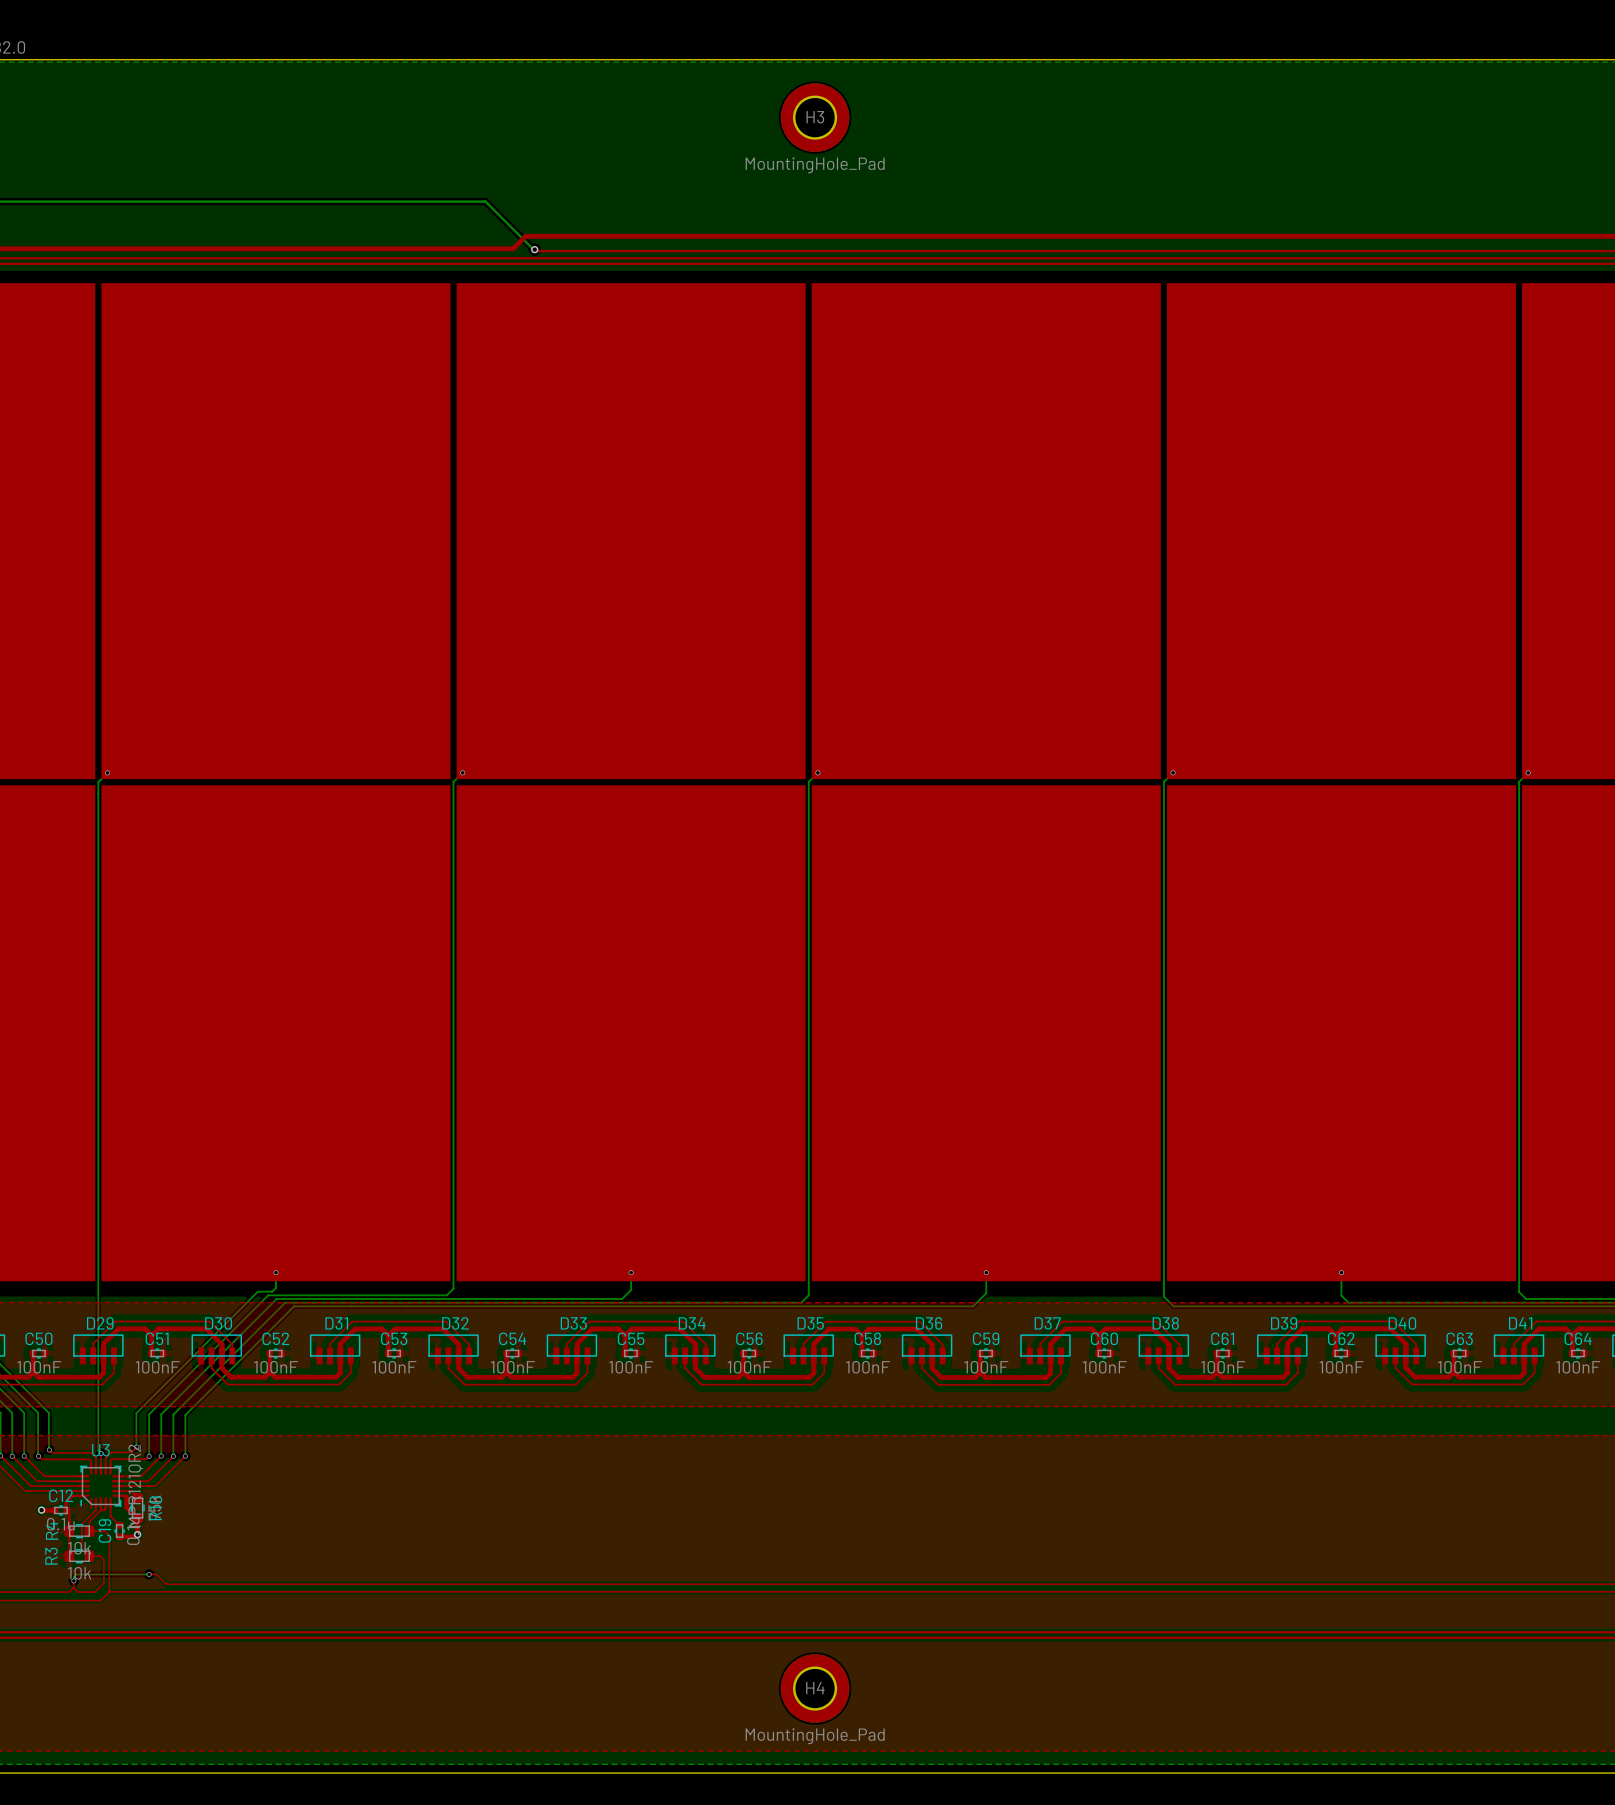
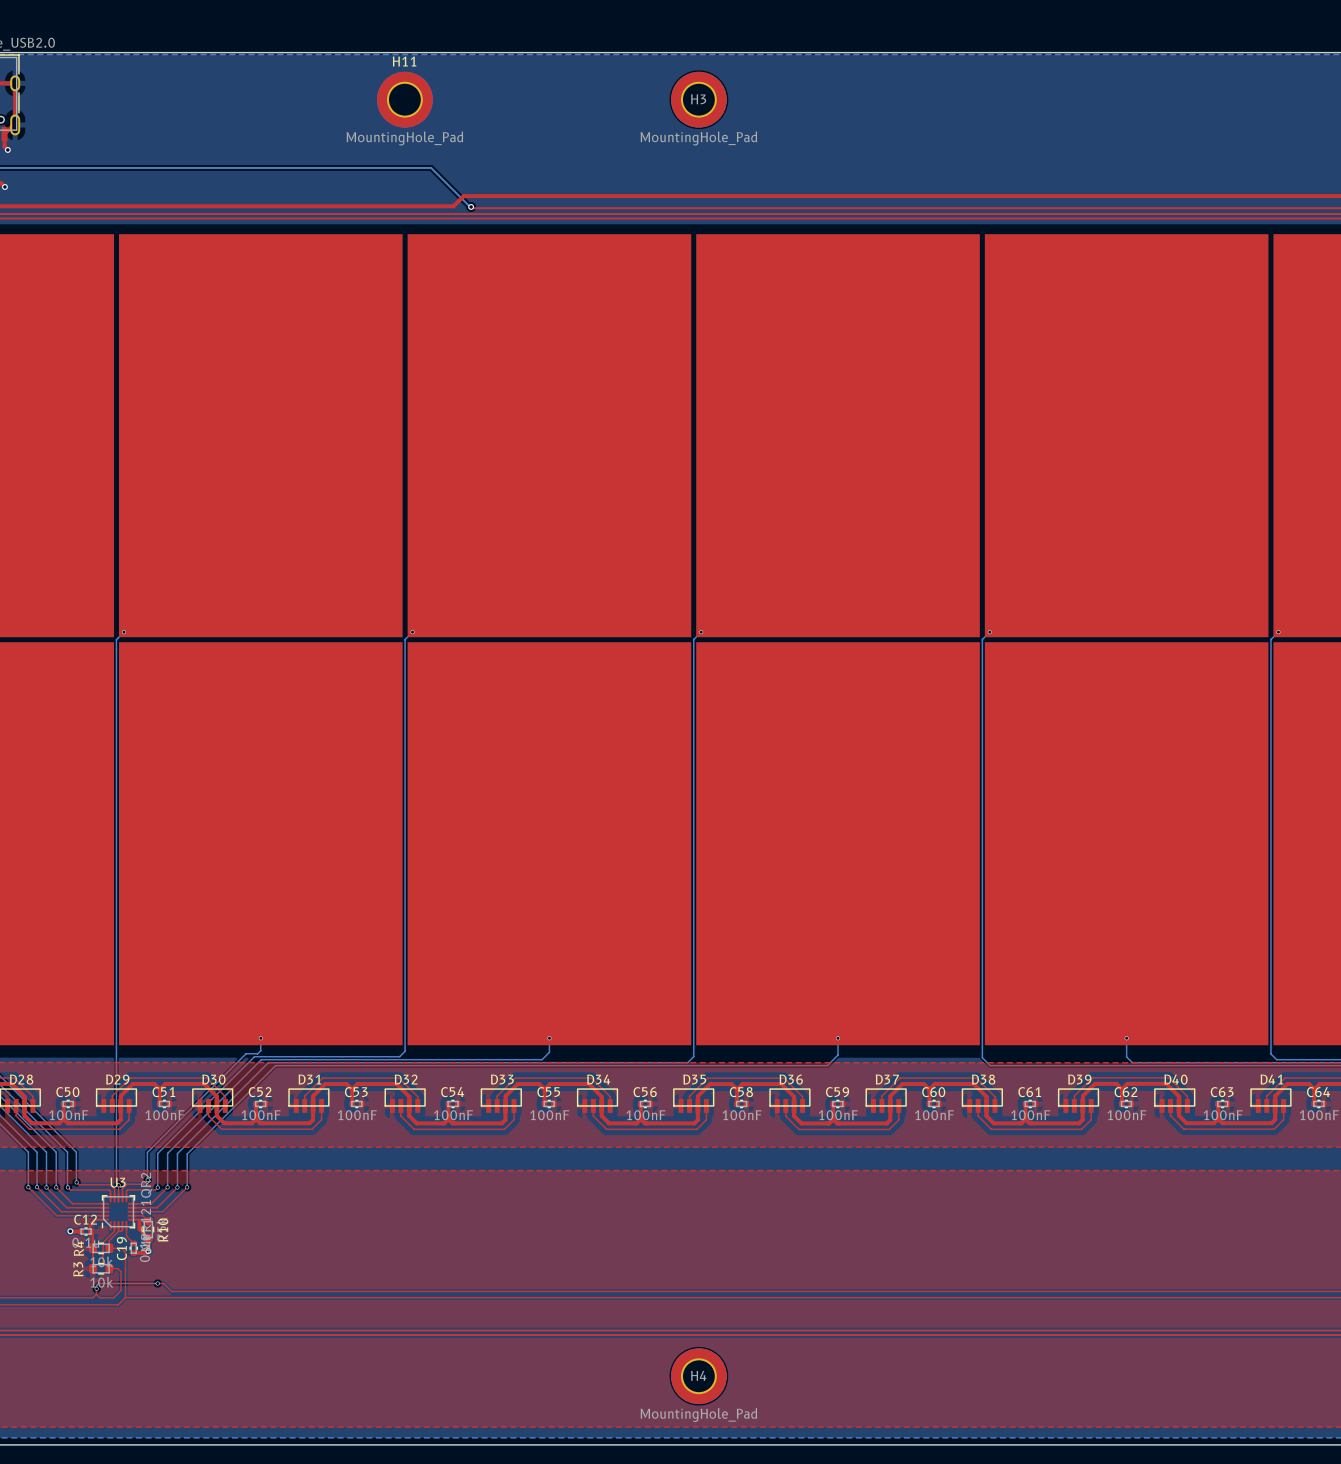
H11: none -> MountingHole_Pad (404, 99)

